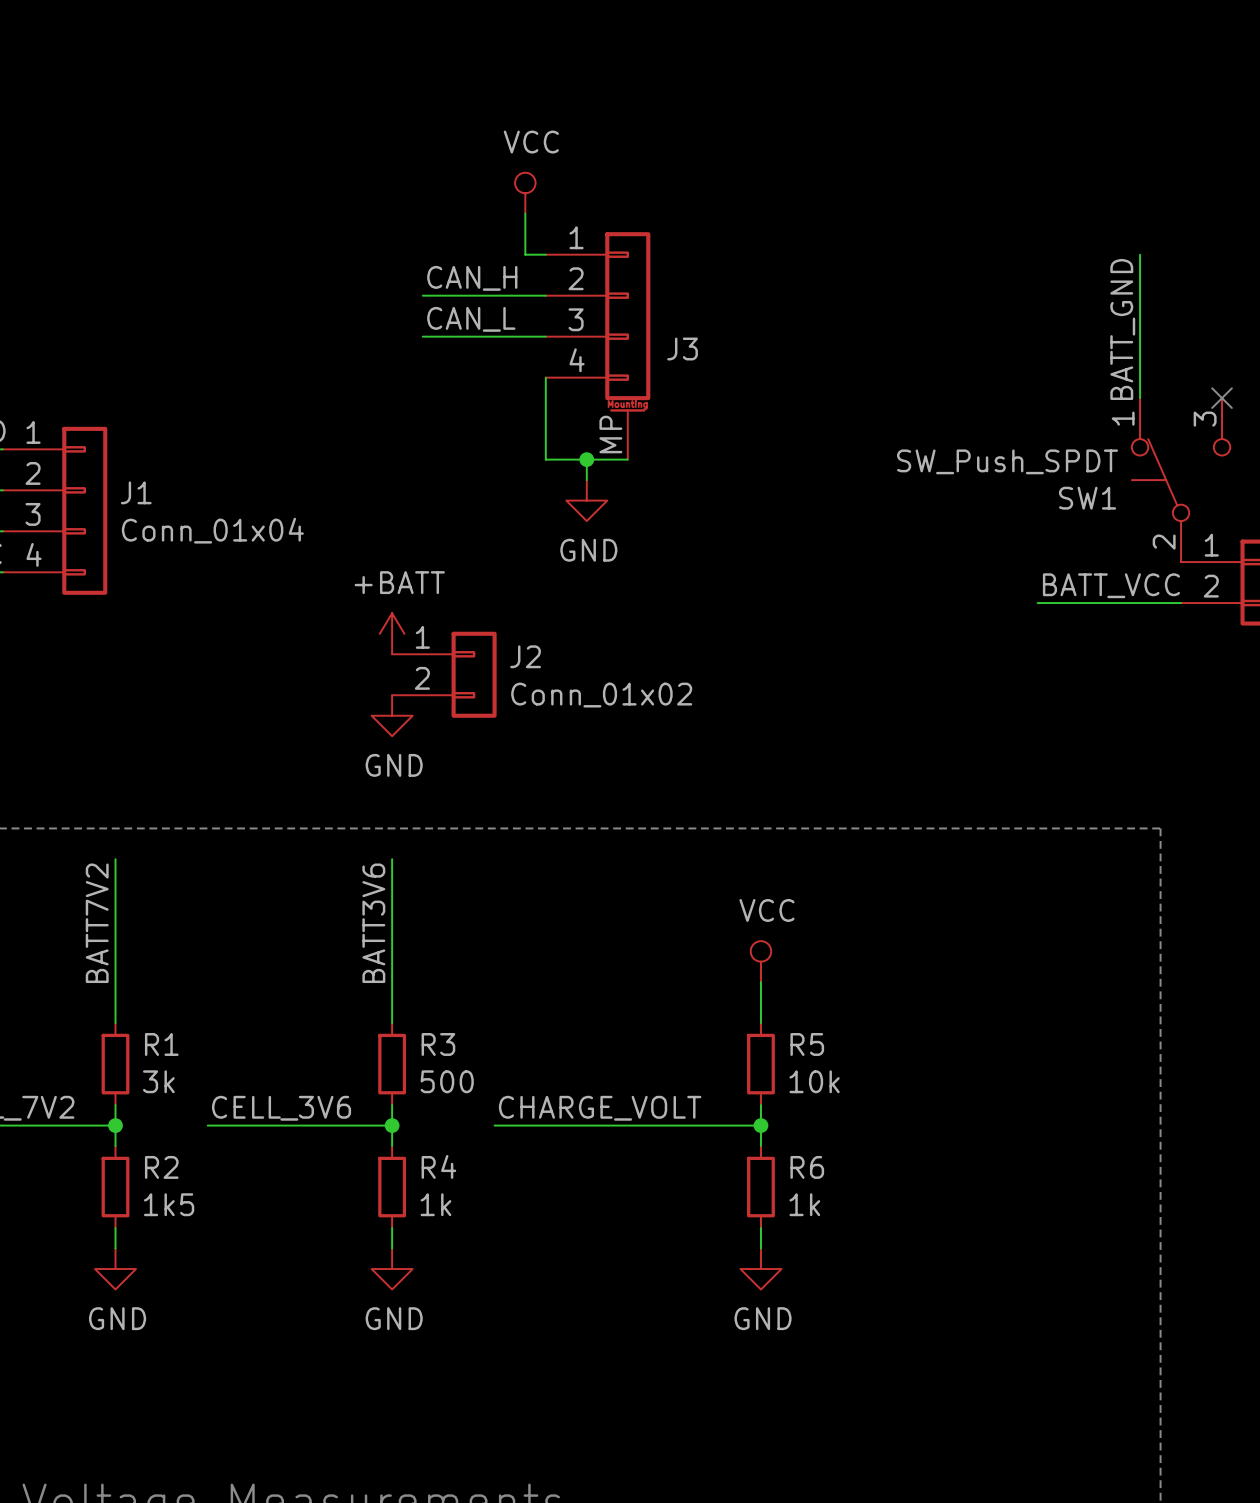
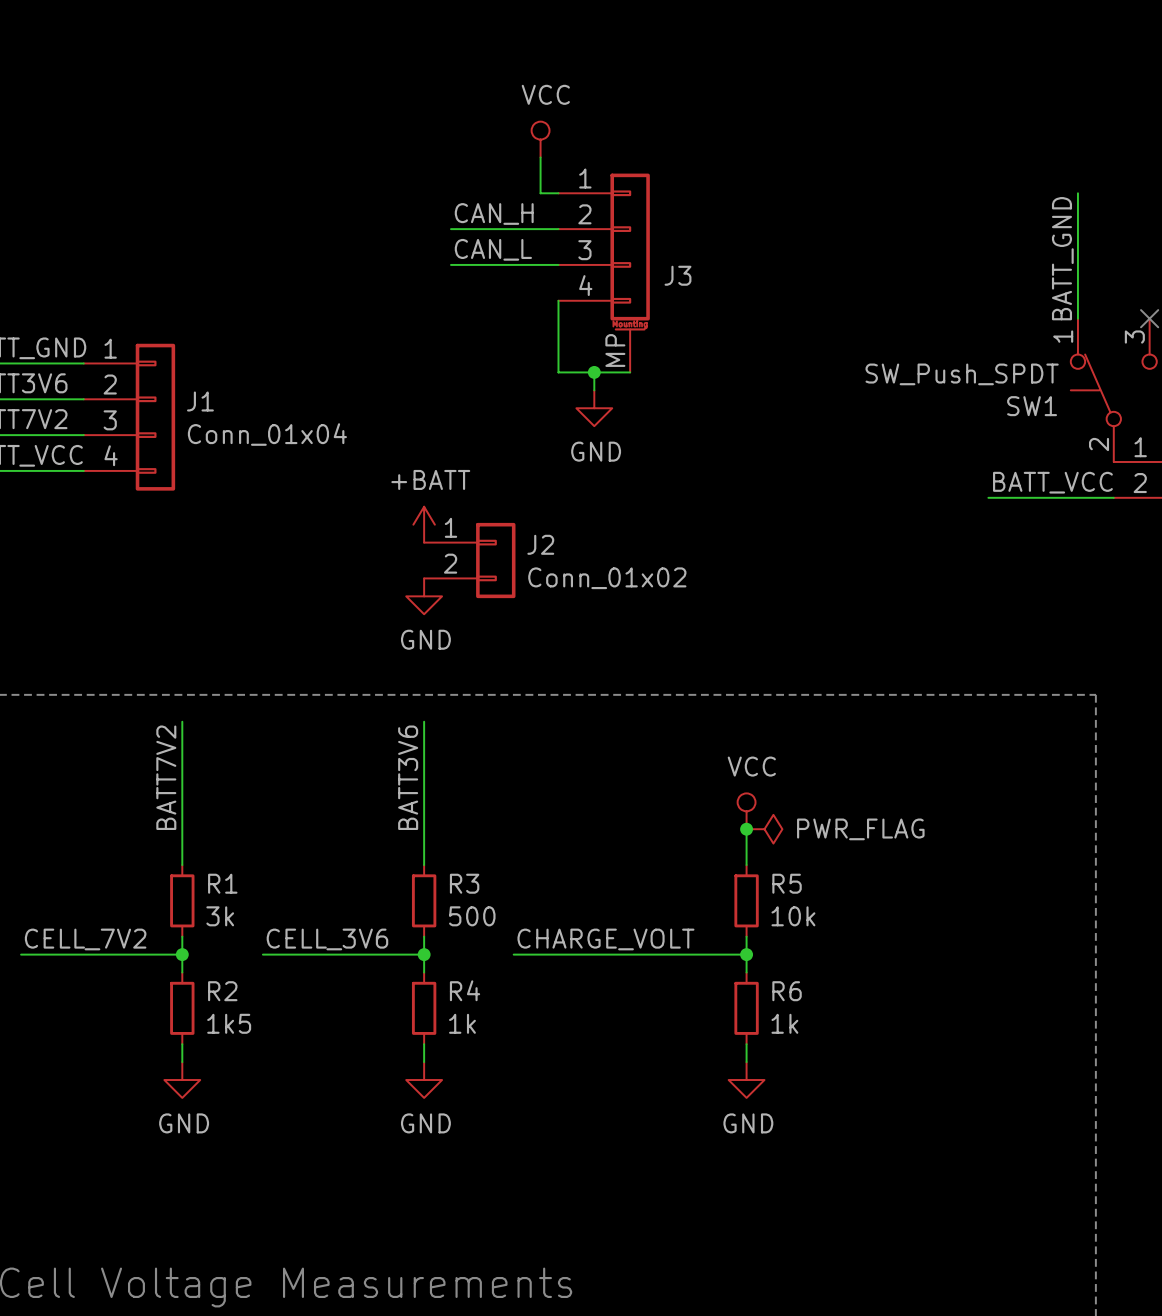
junction: none -> (746, 829)
power symbol: none -> PWR_FLAG (764, 829)

